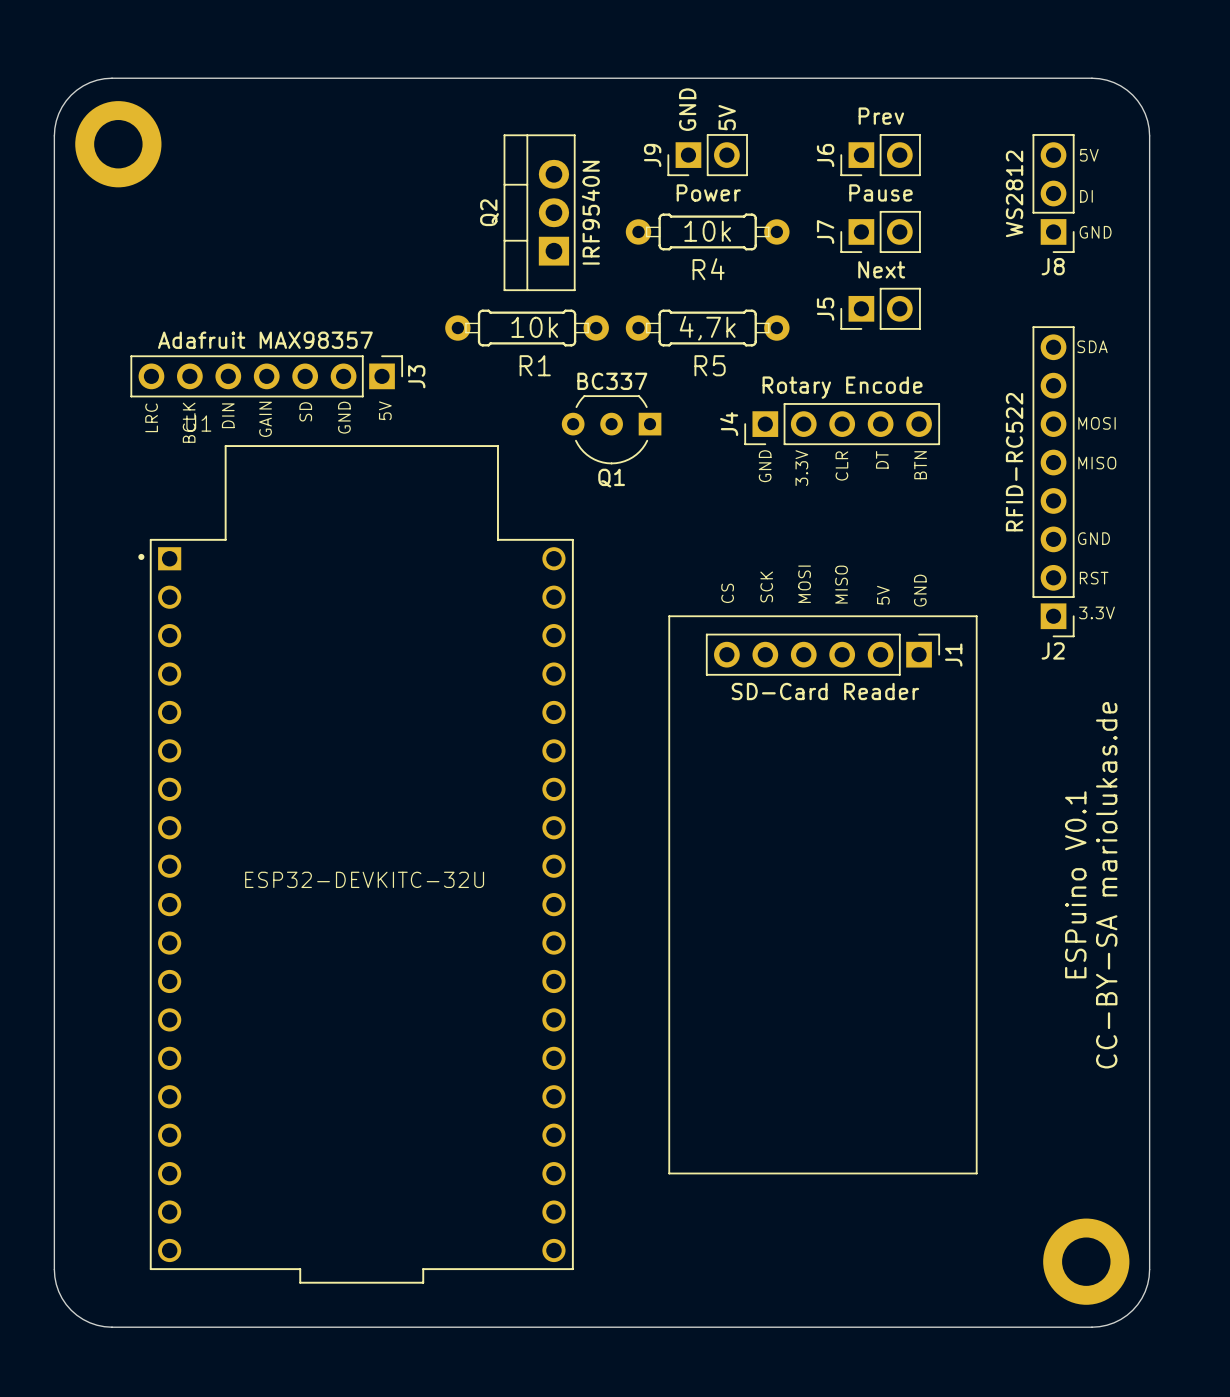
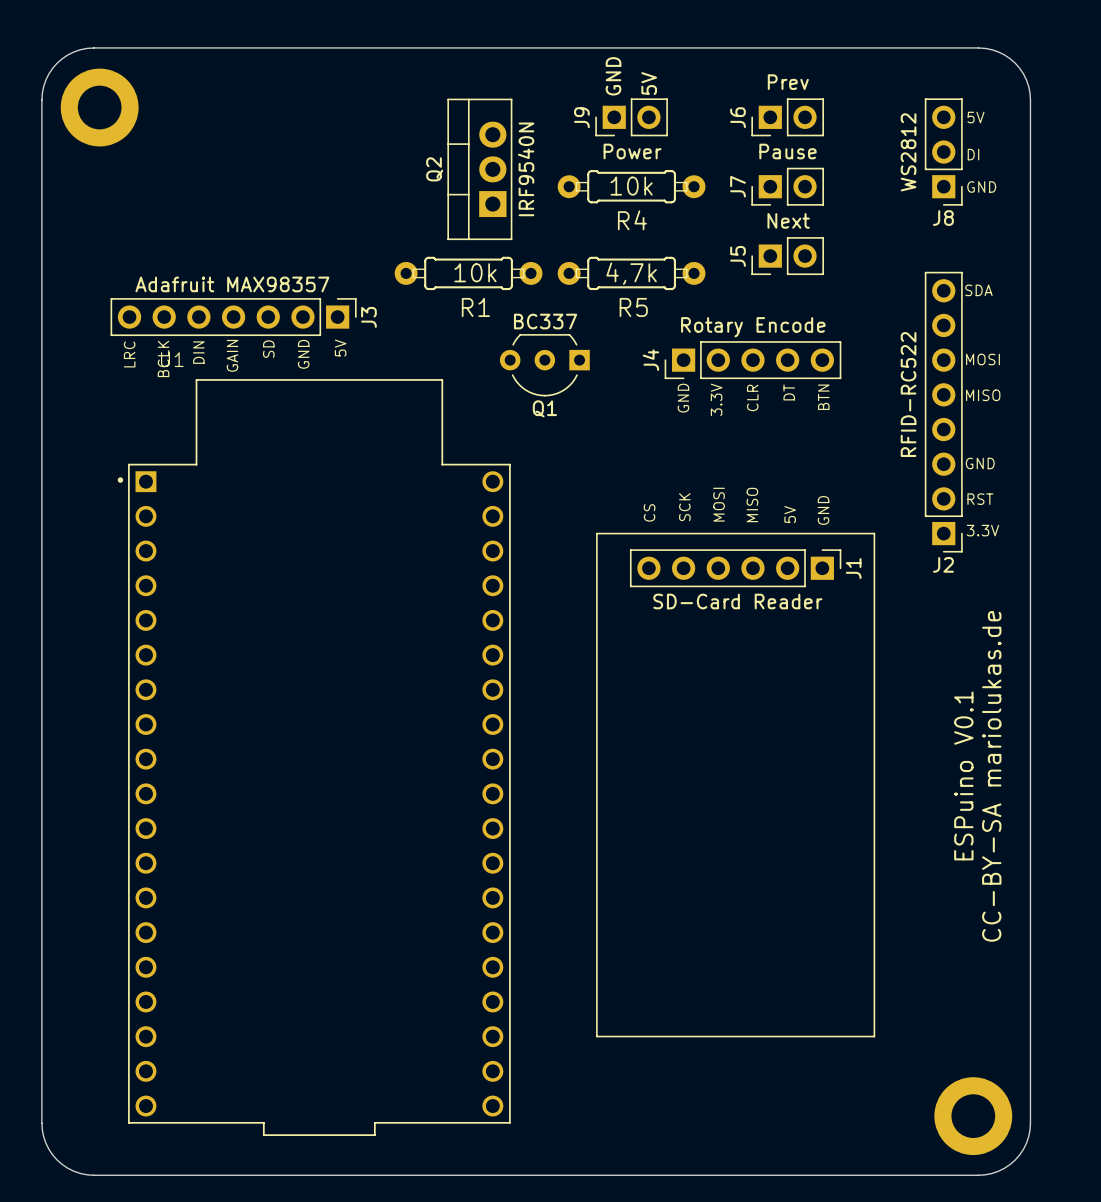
U1 value: ESP32-DEVKITC-32U (364, 879) -> none

